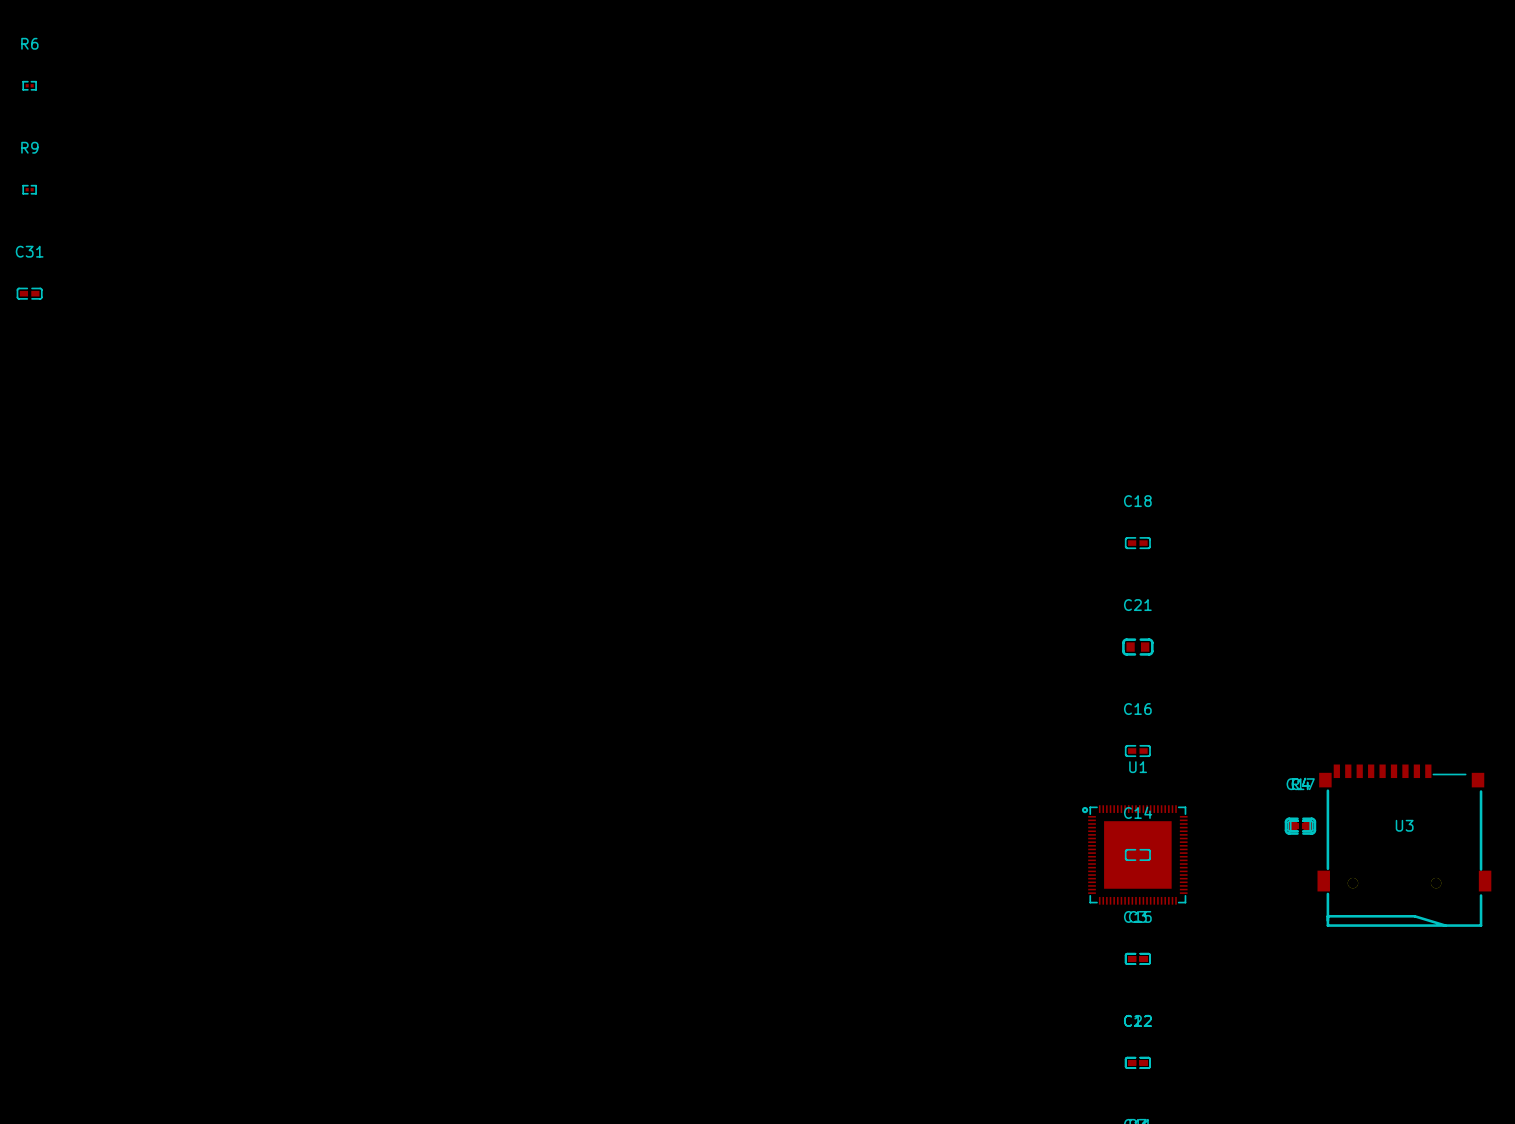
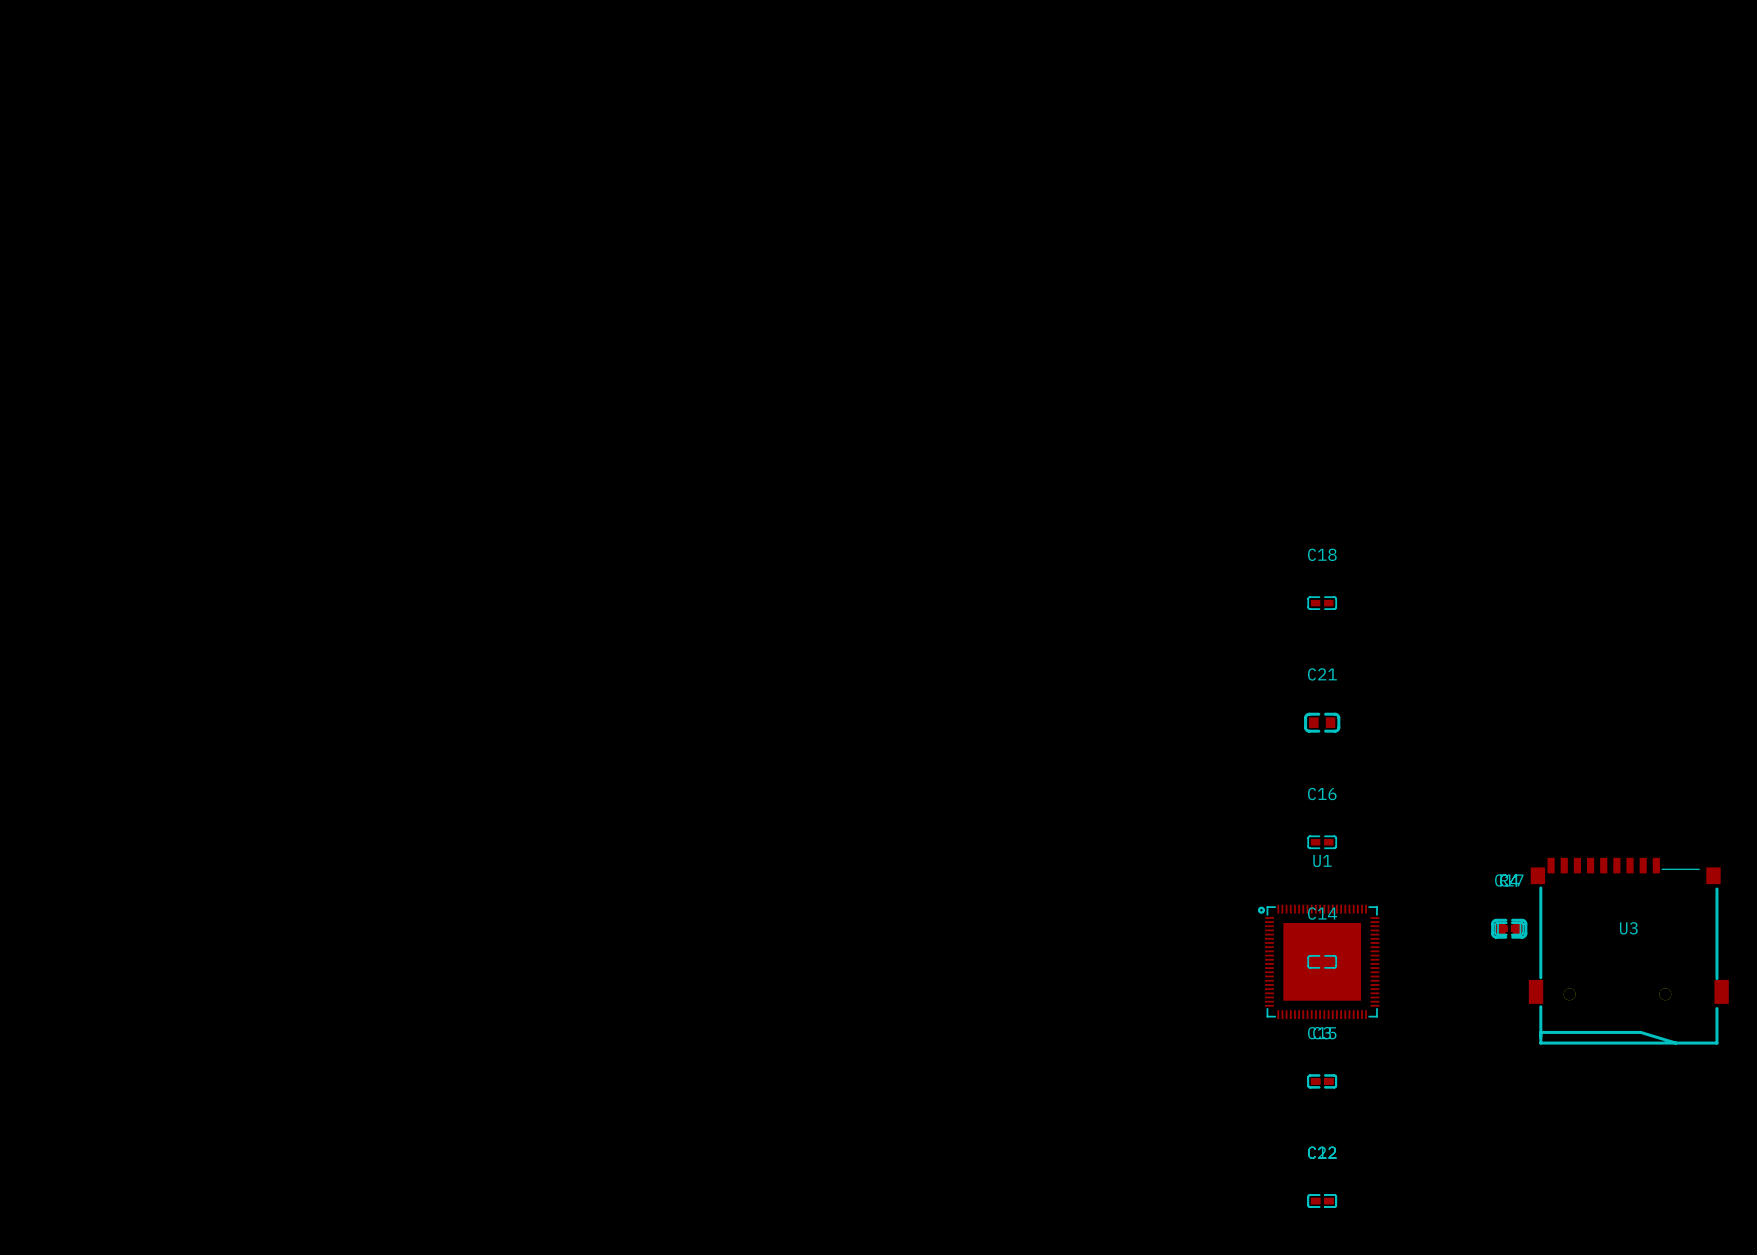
R6: (29, 85) -> none
R9: (29, 189) -> none
C31: (29, 293) -> none

